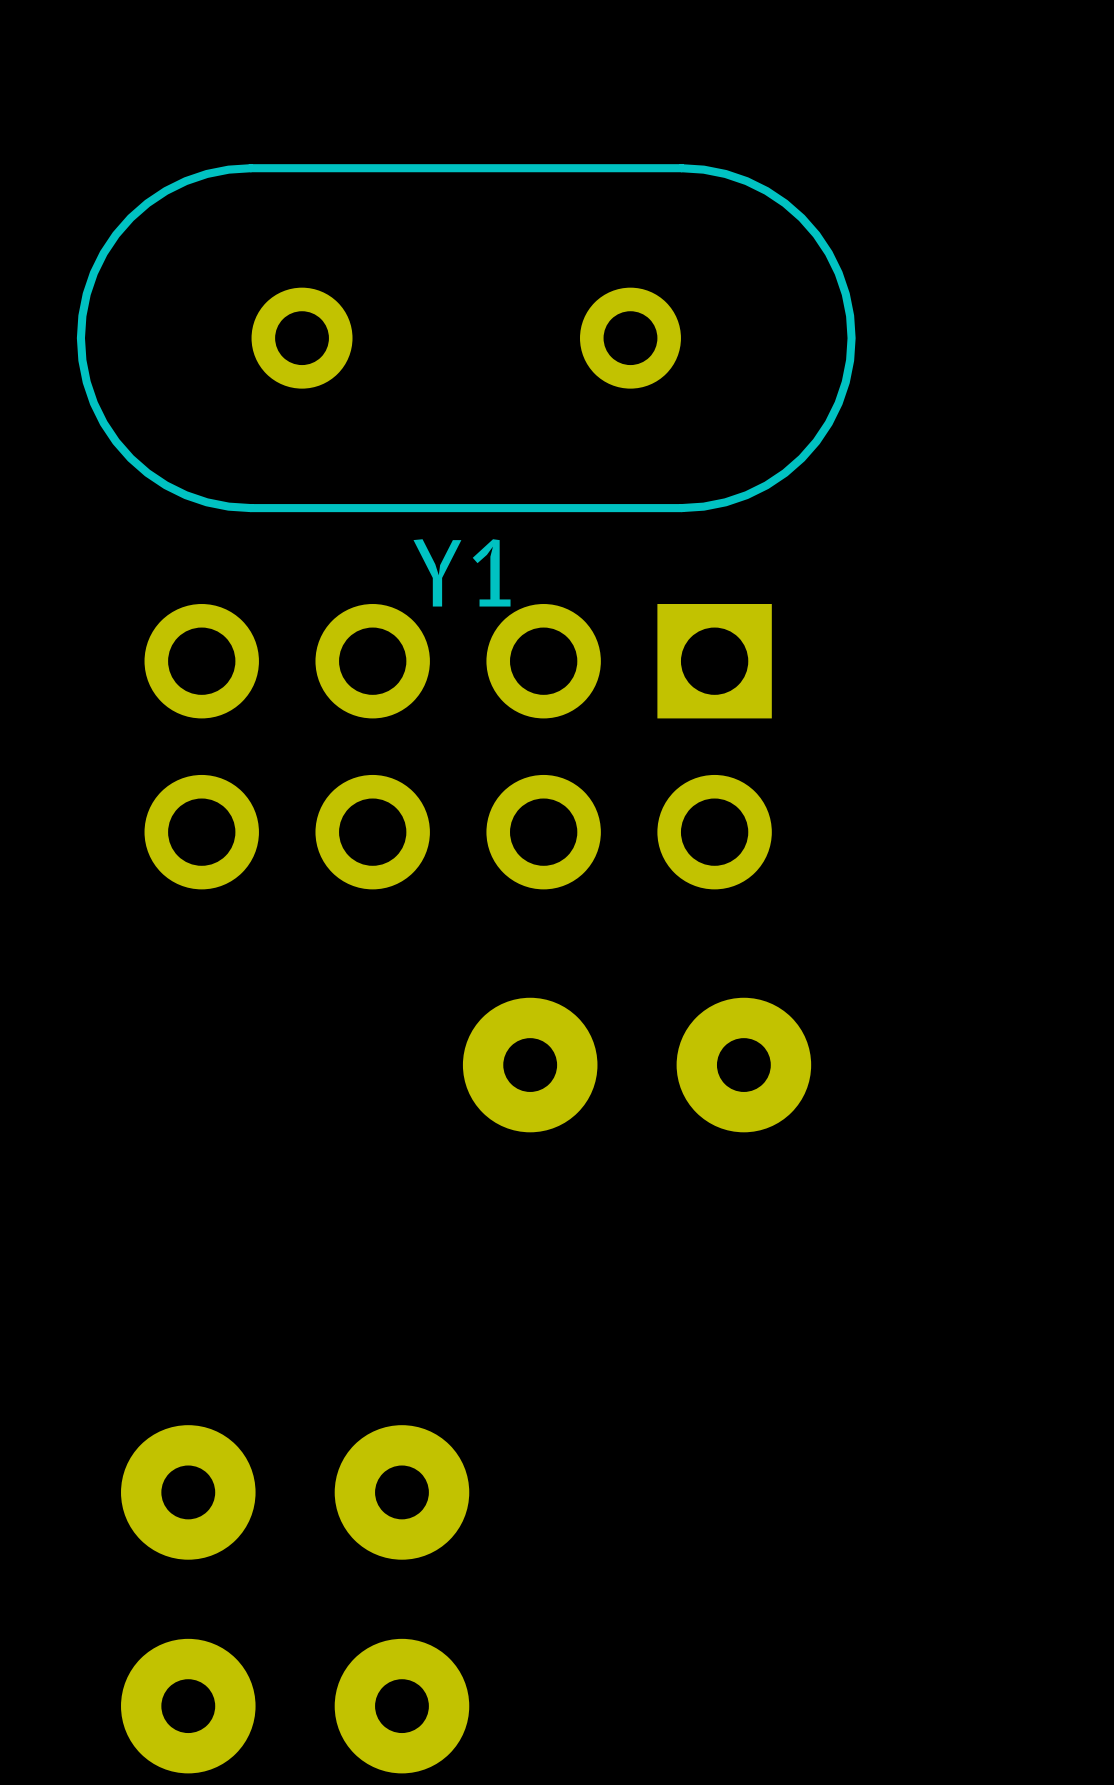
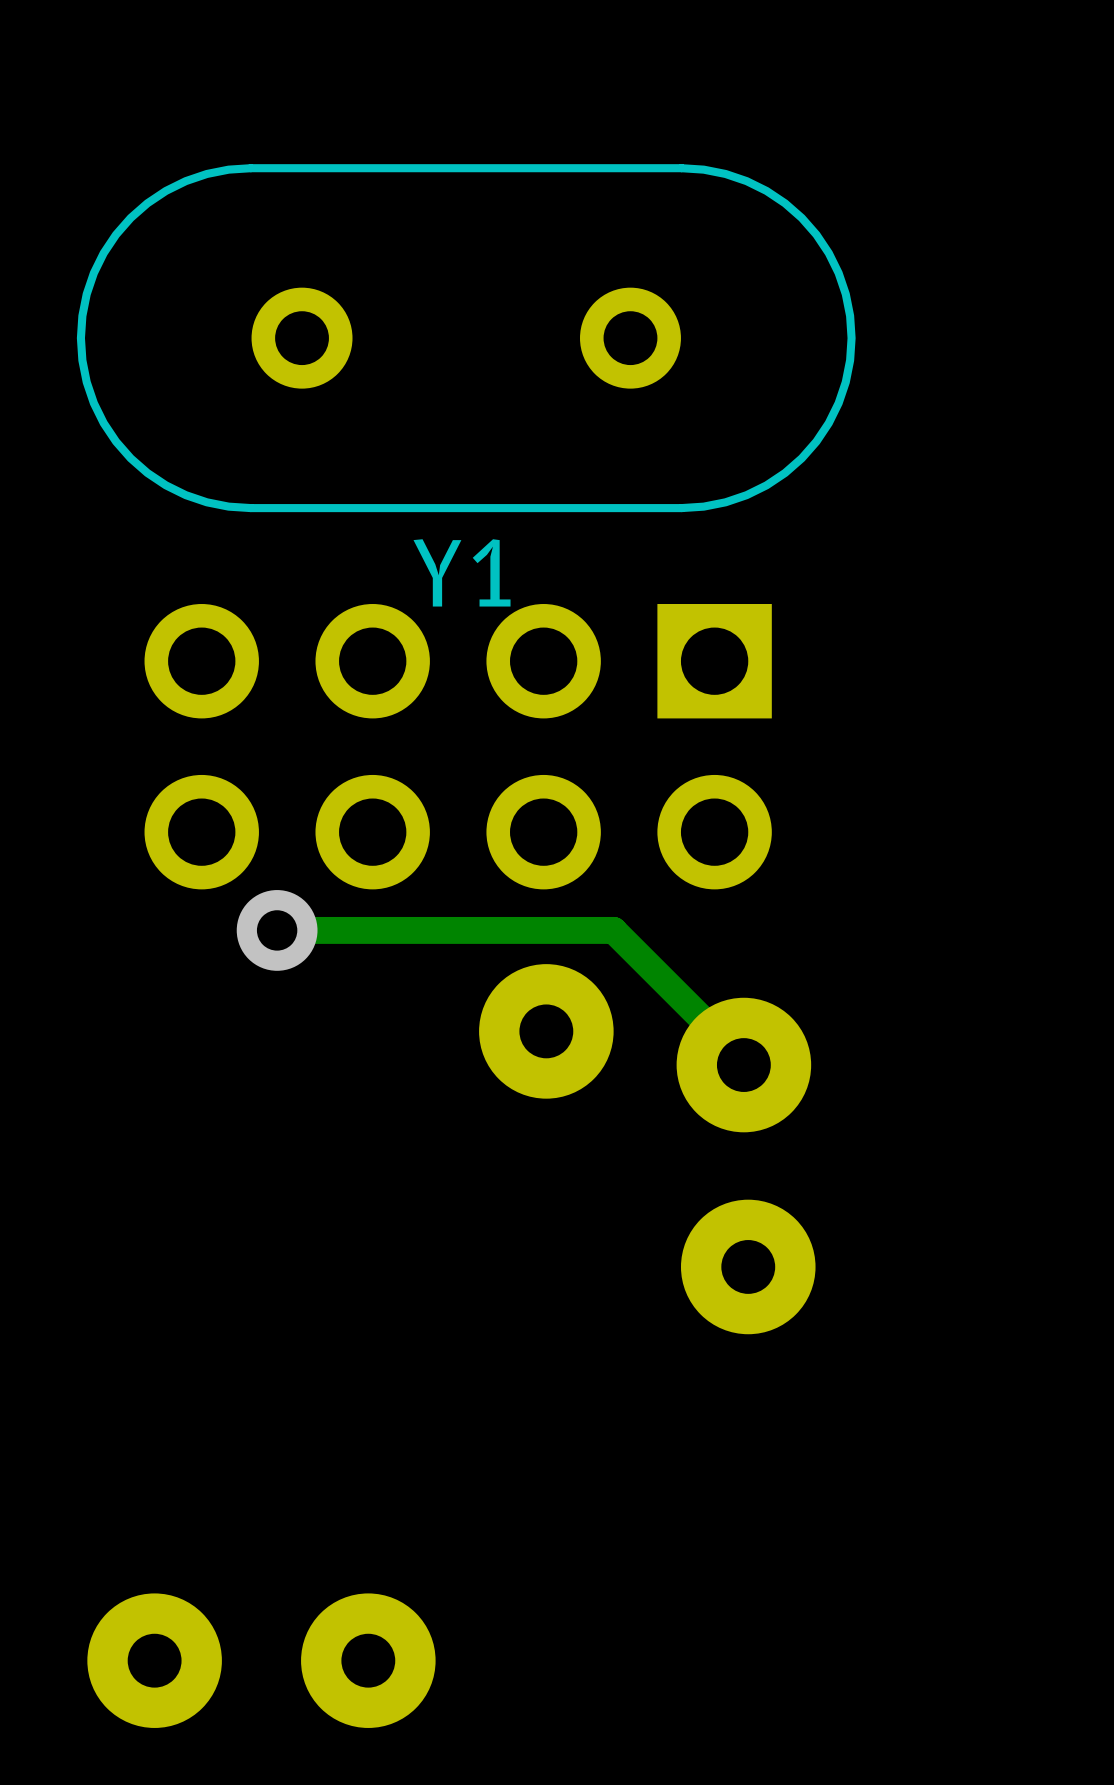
track: none -> (277, 930) (613, 930) (748, 1065)
via: none -> (277, 930)
part position: (530, 1065) -> (546, 1031)
part: none -> (748, 1266)
part: (188, 1492) -> none
part: (401, 1492) -> none
part position: (188, 1706) -> (154, 1660)
part position: (401, 1706) -> (368, 1660)

